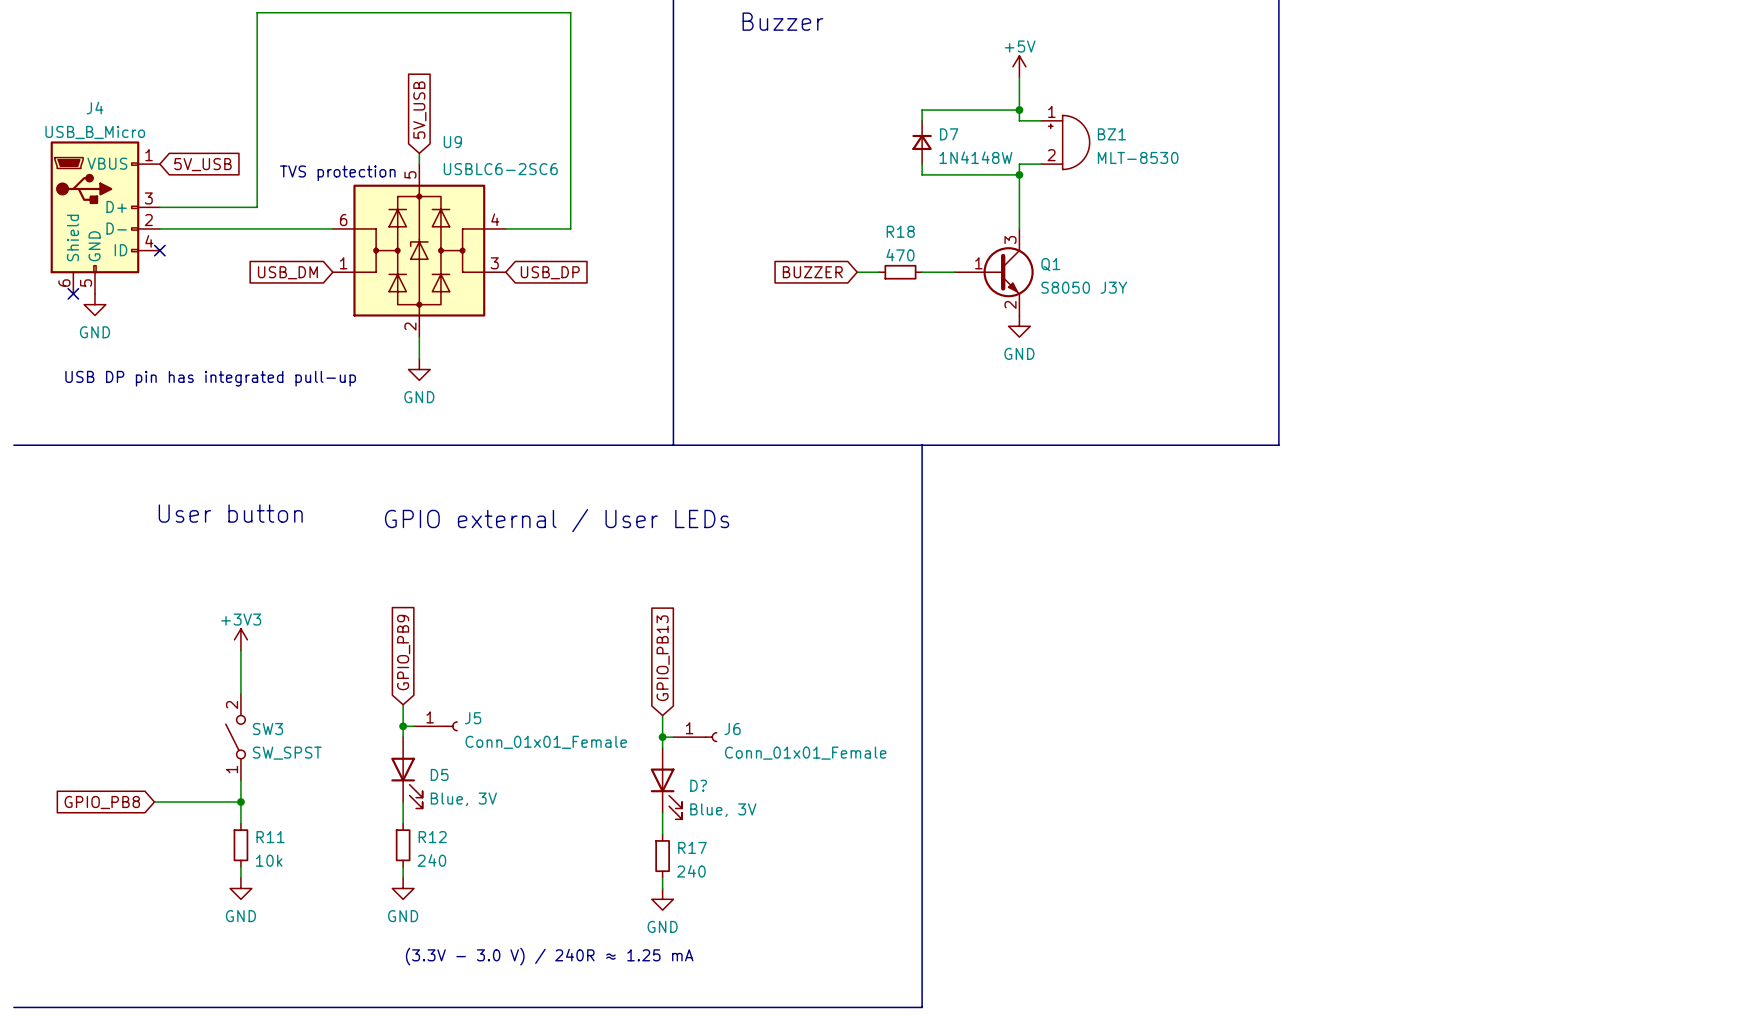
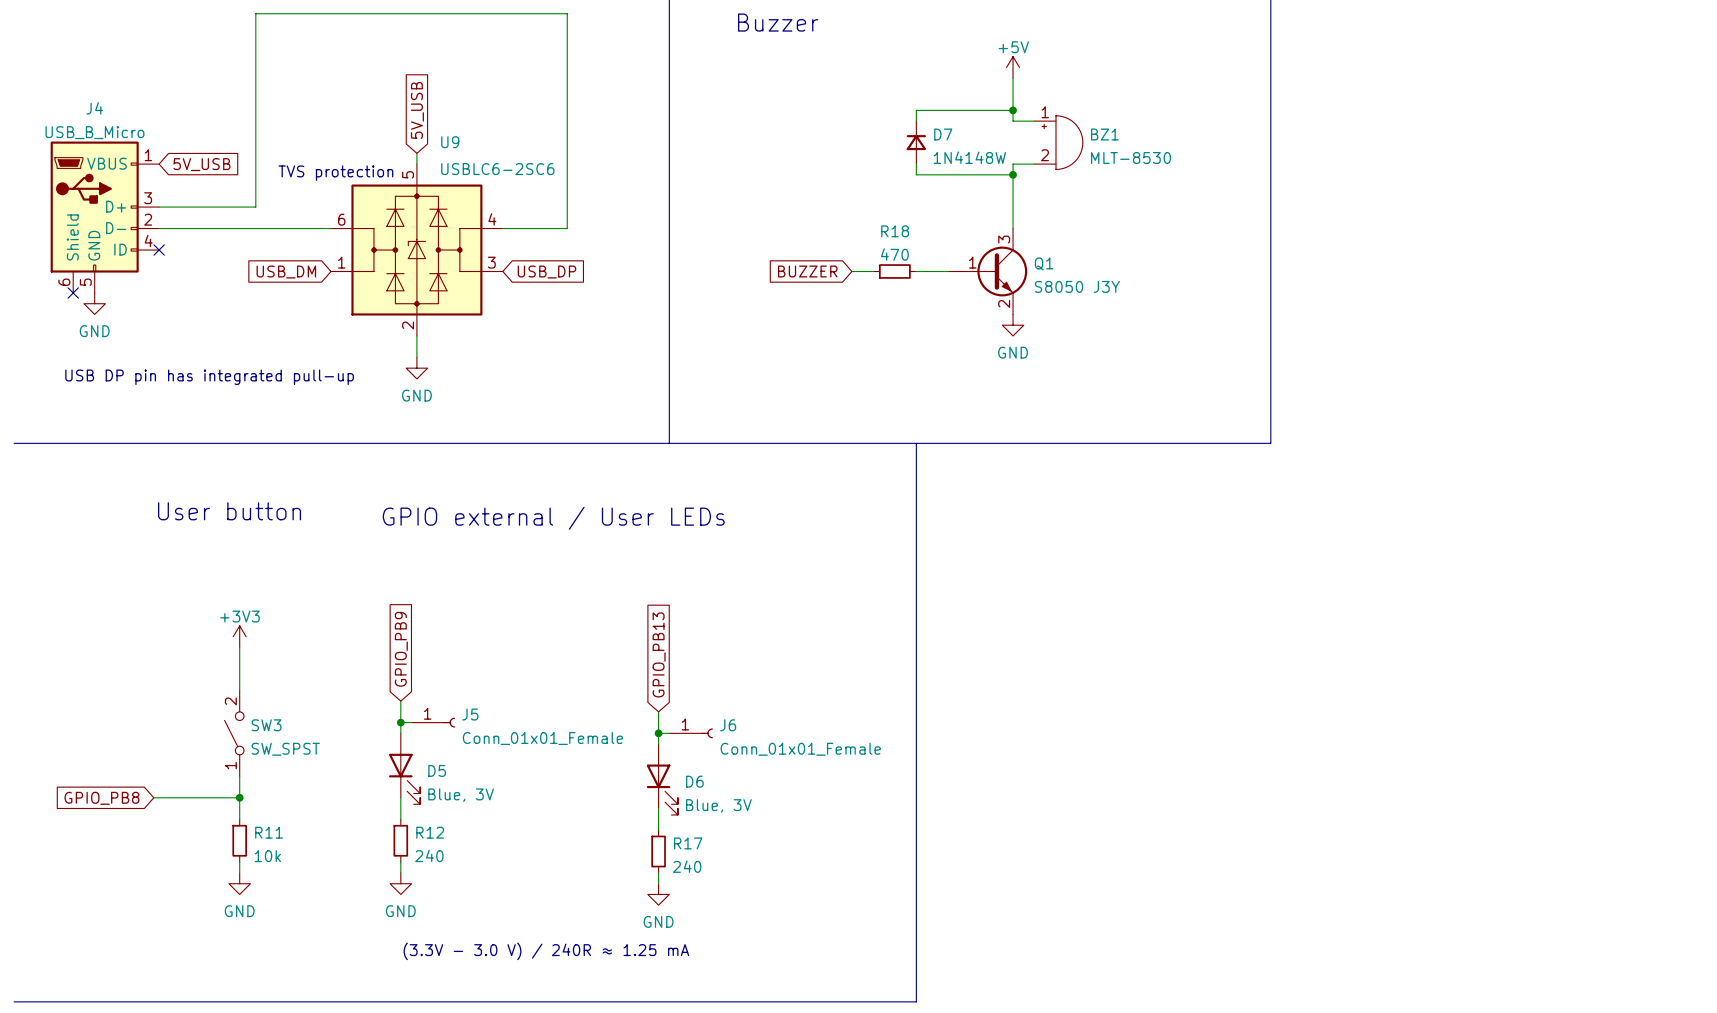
D? name: D? (698, 785) -> D6 (694, 781)

